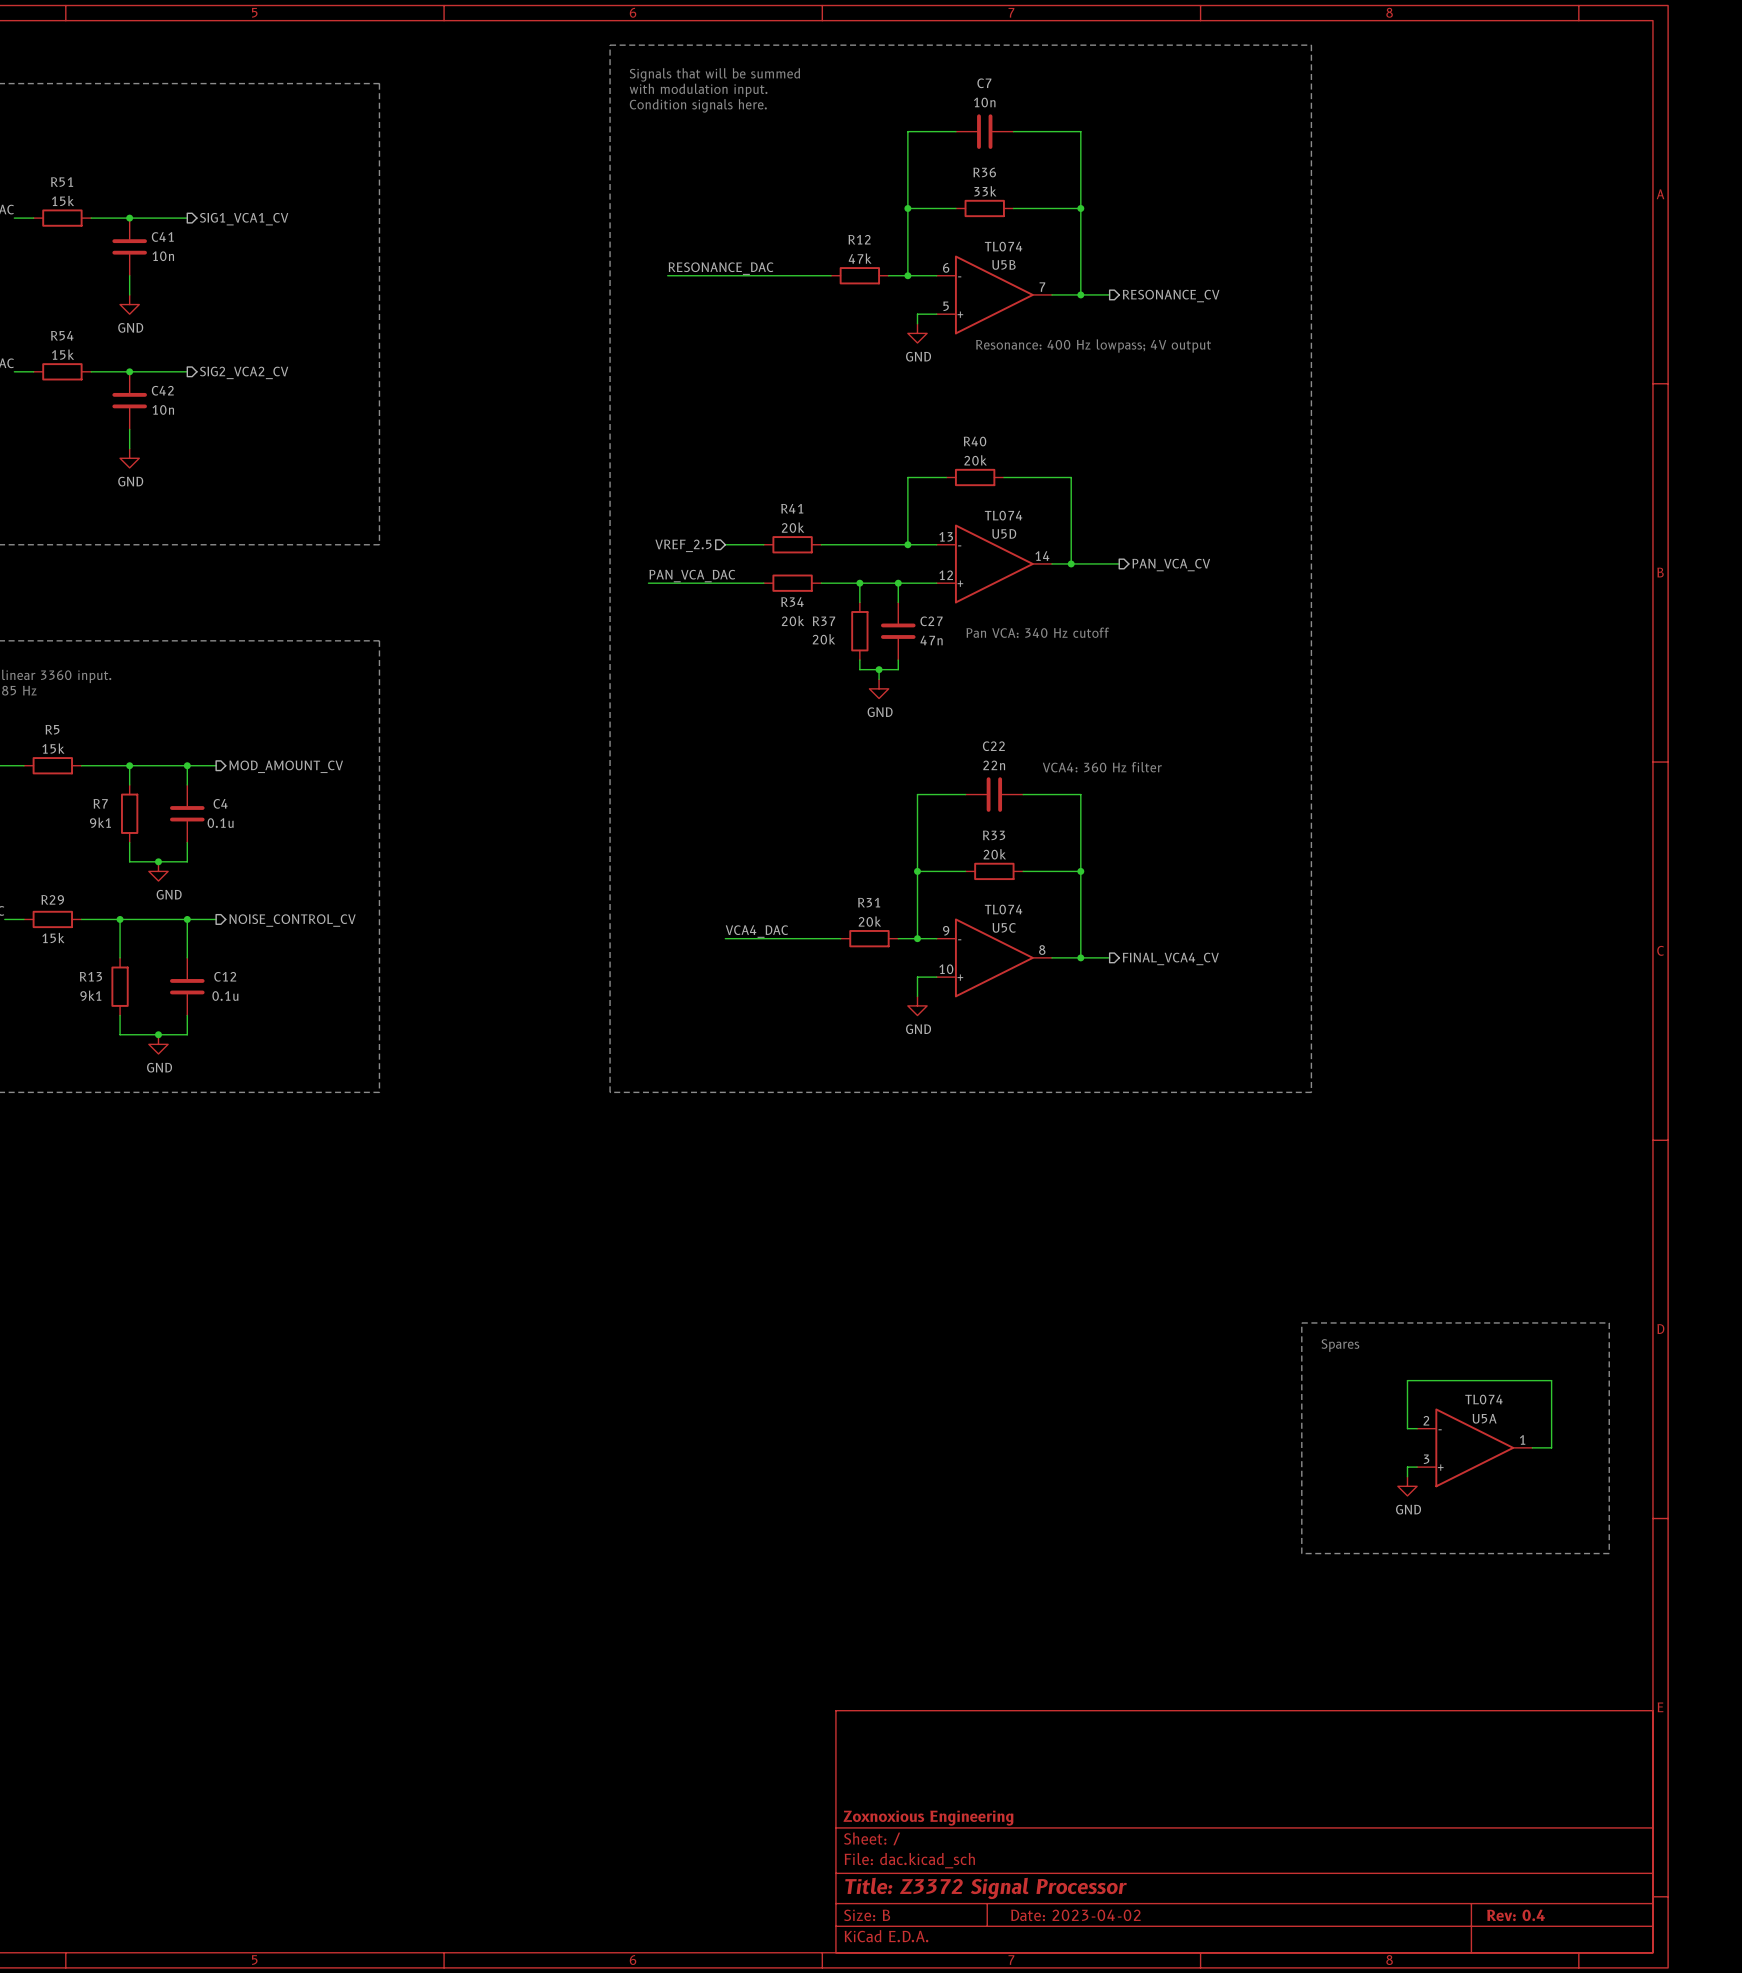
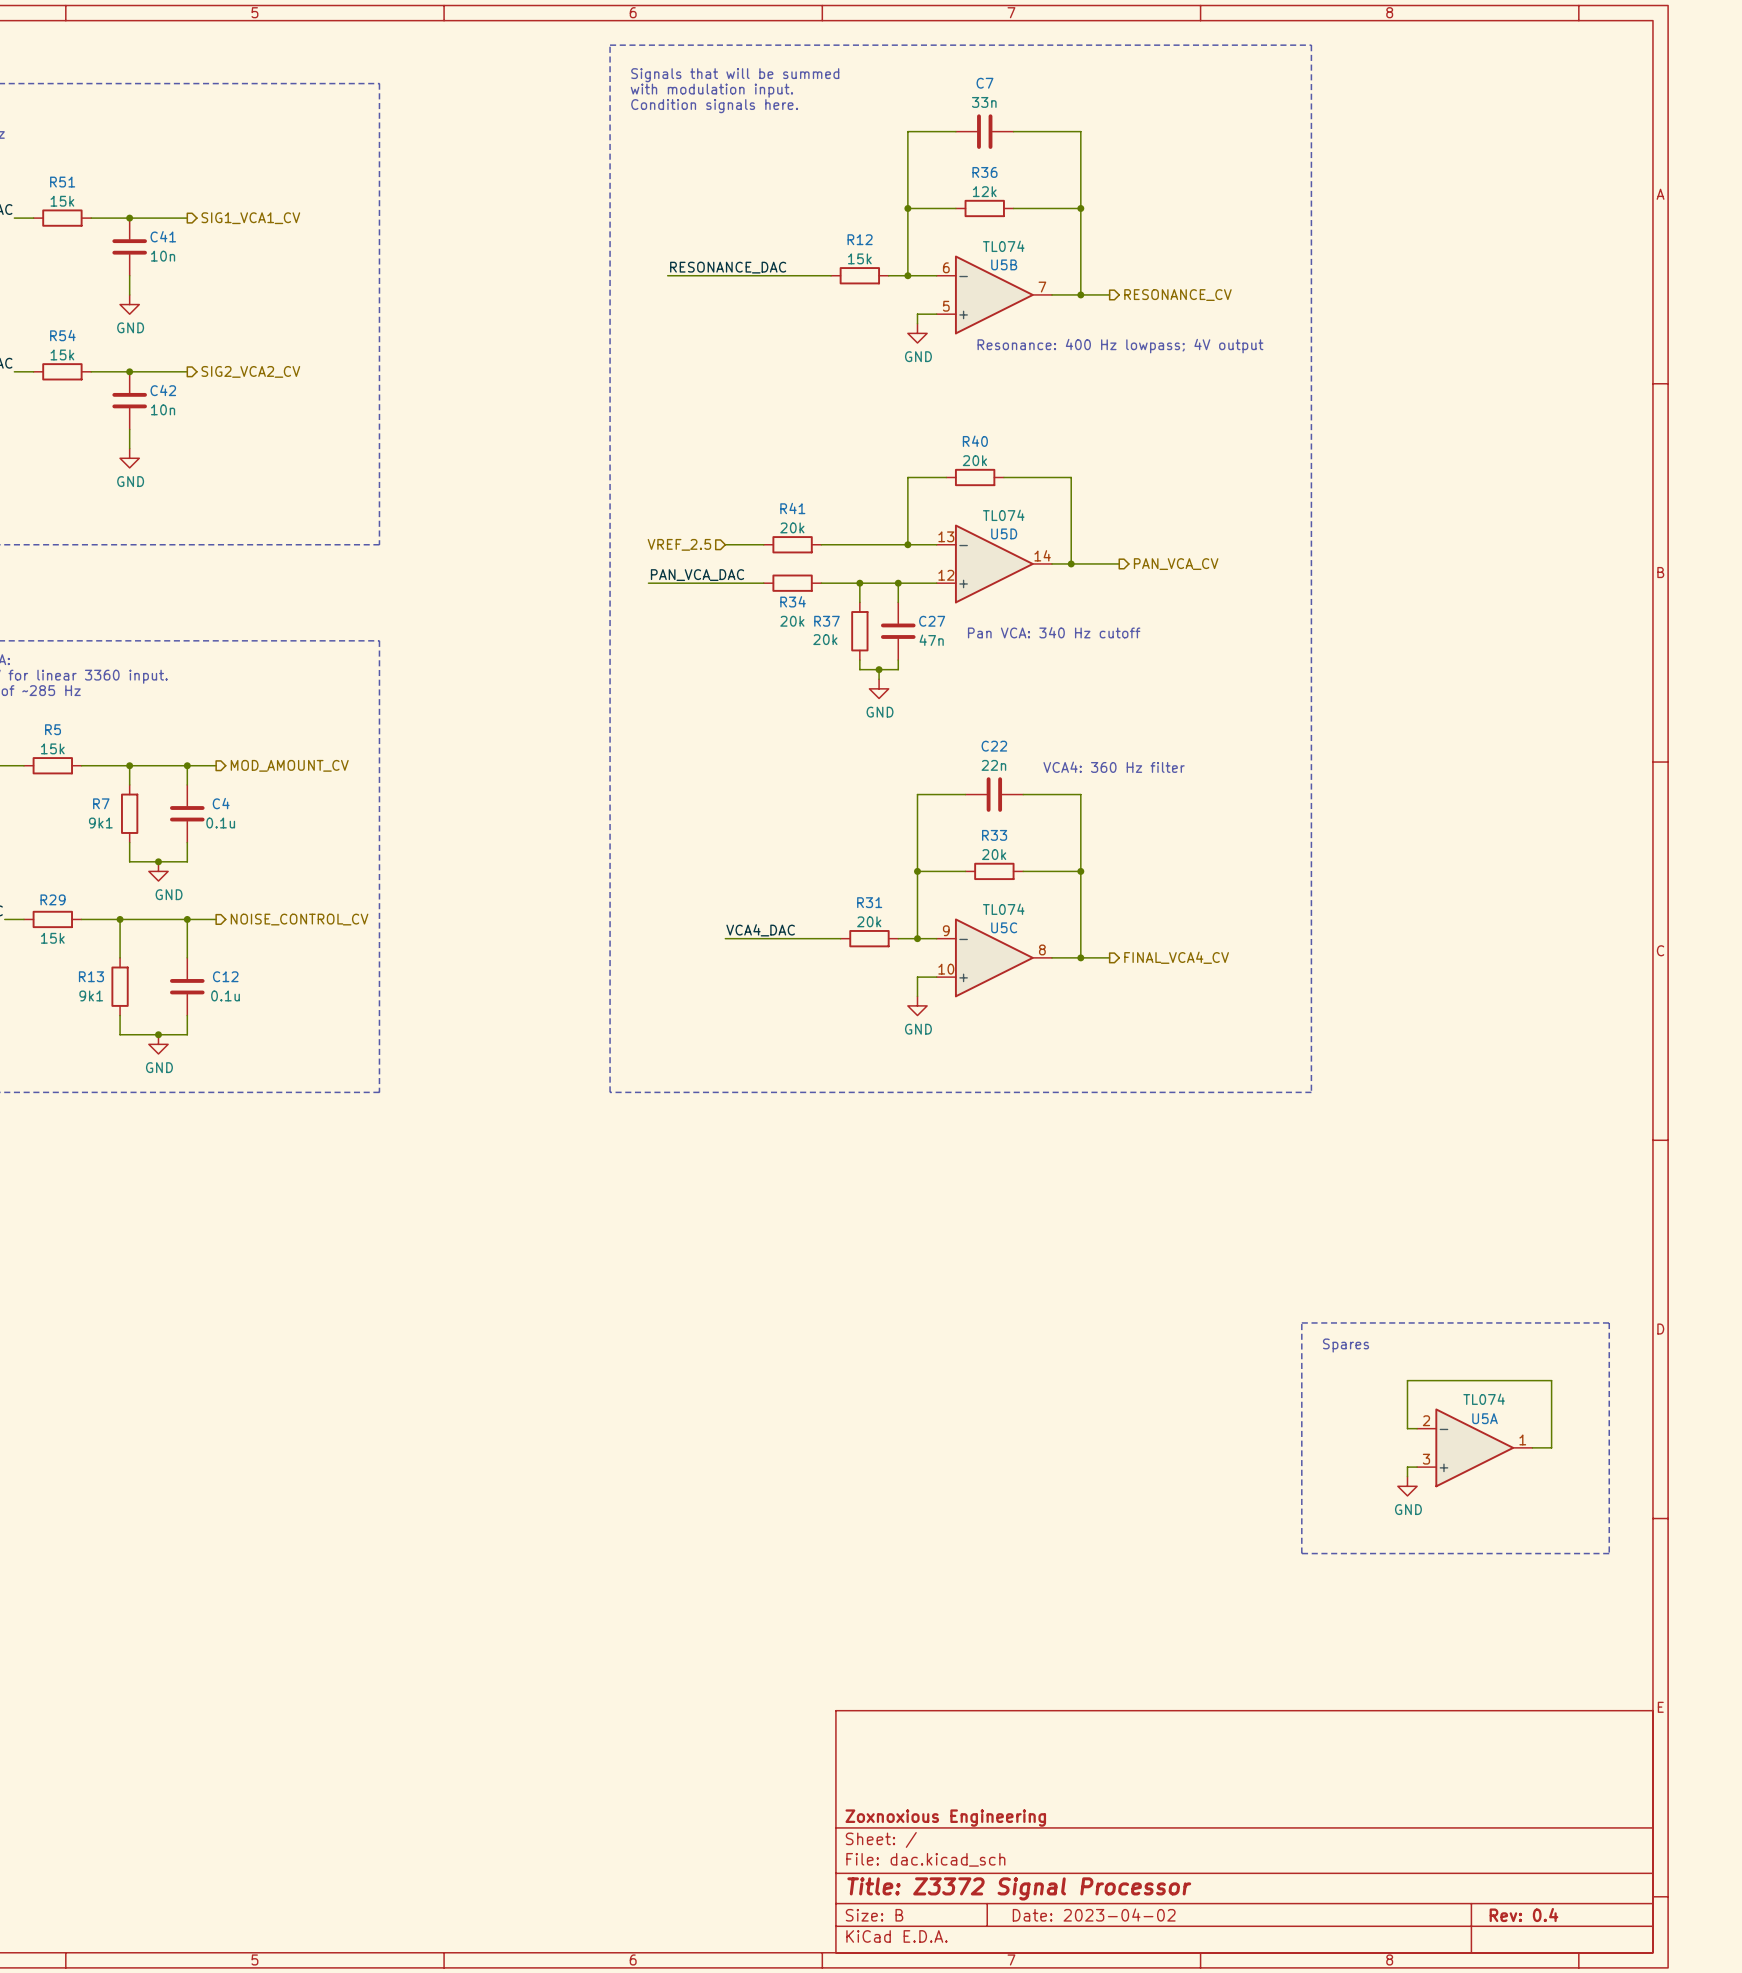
C7 value: 10n (984, 102) -> 33n (984, 102)
R36 value: 33k (985, 191) -> 12k (984, 191)
R12 value: 47k (860, 258) -> 15k (859, 258)

